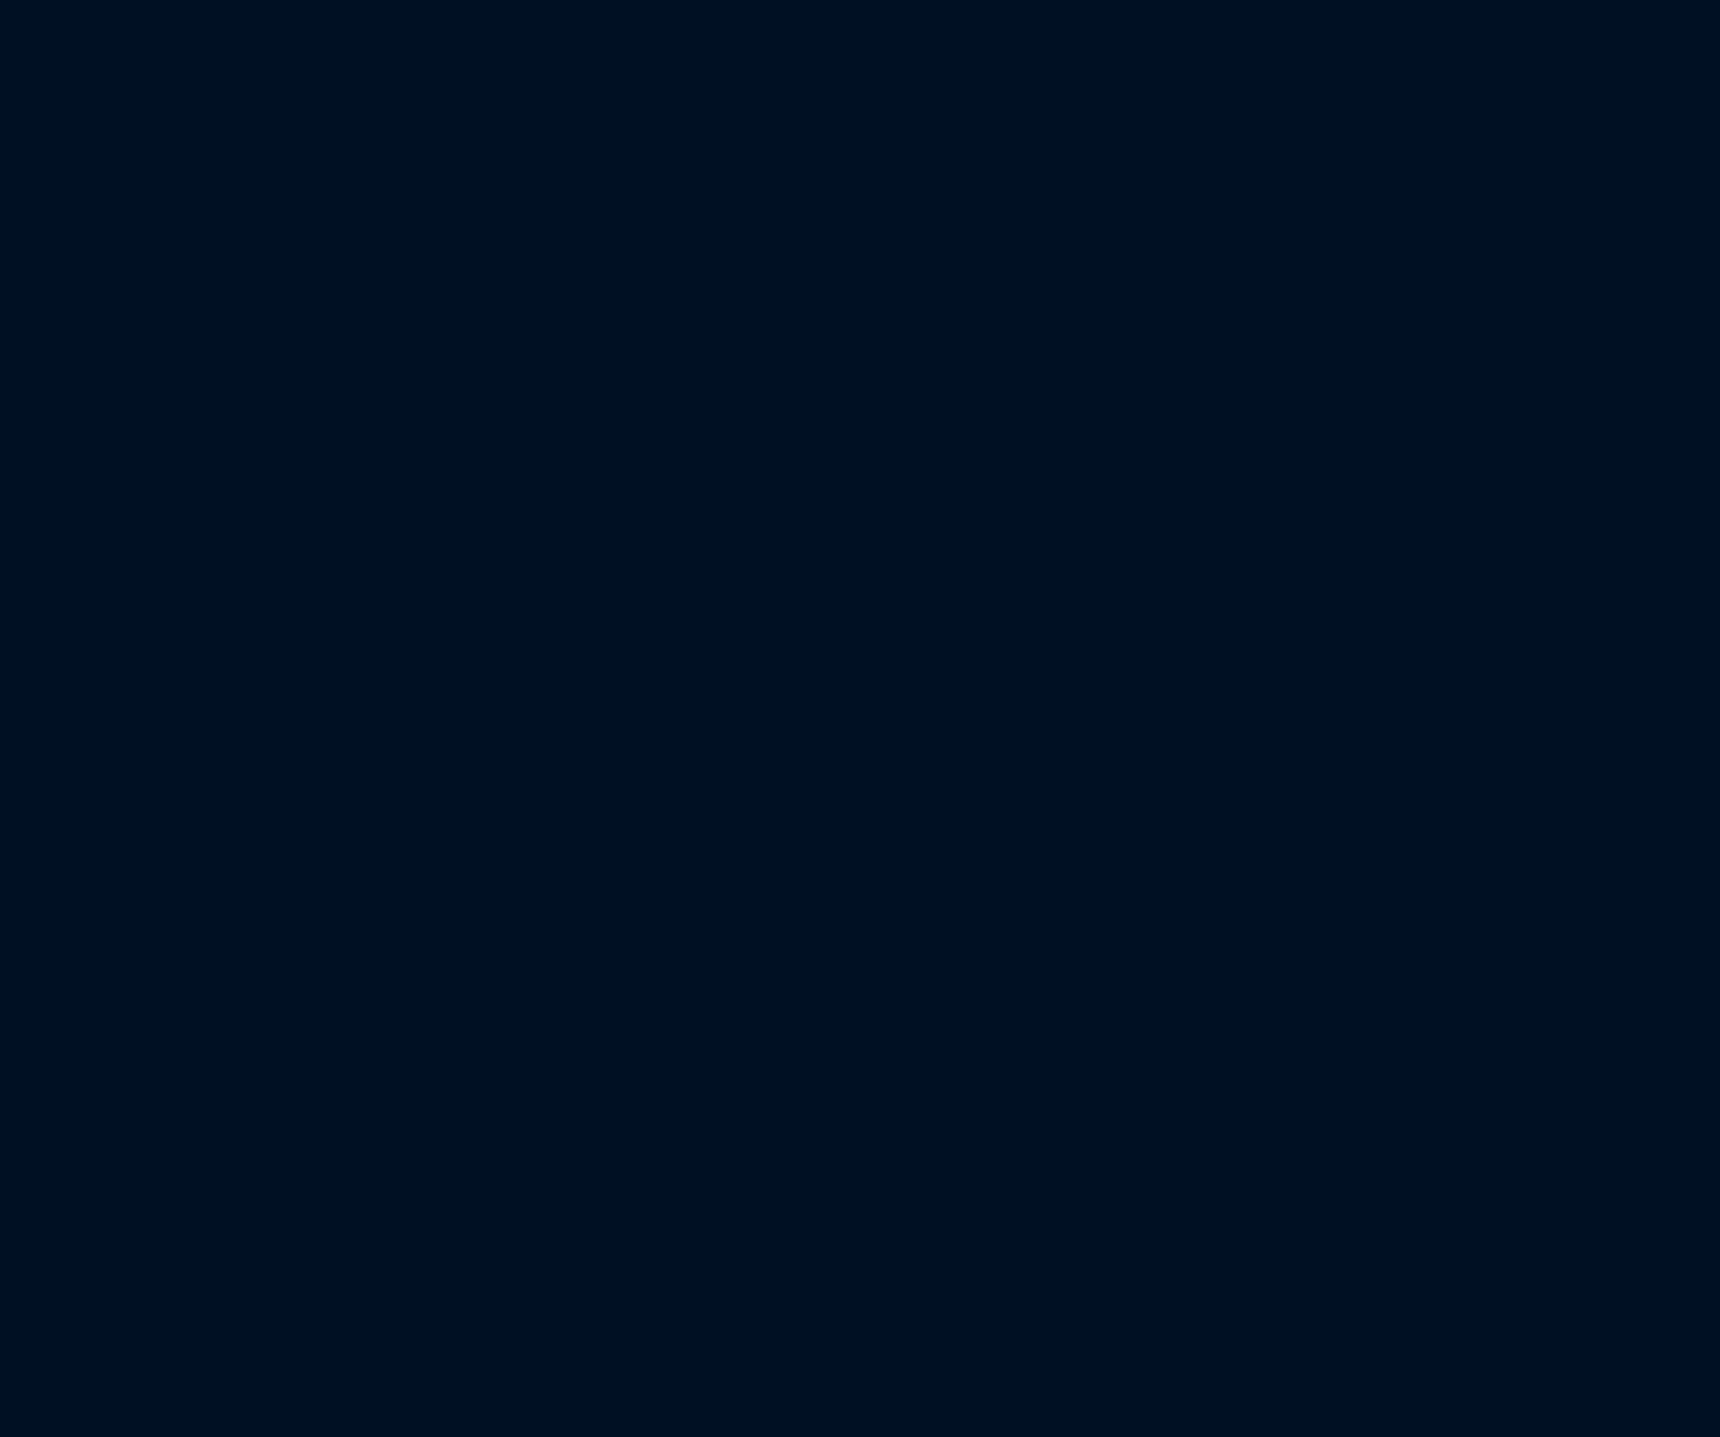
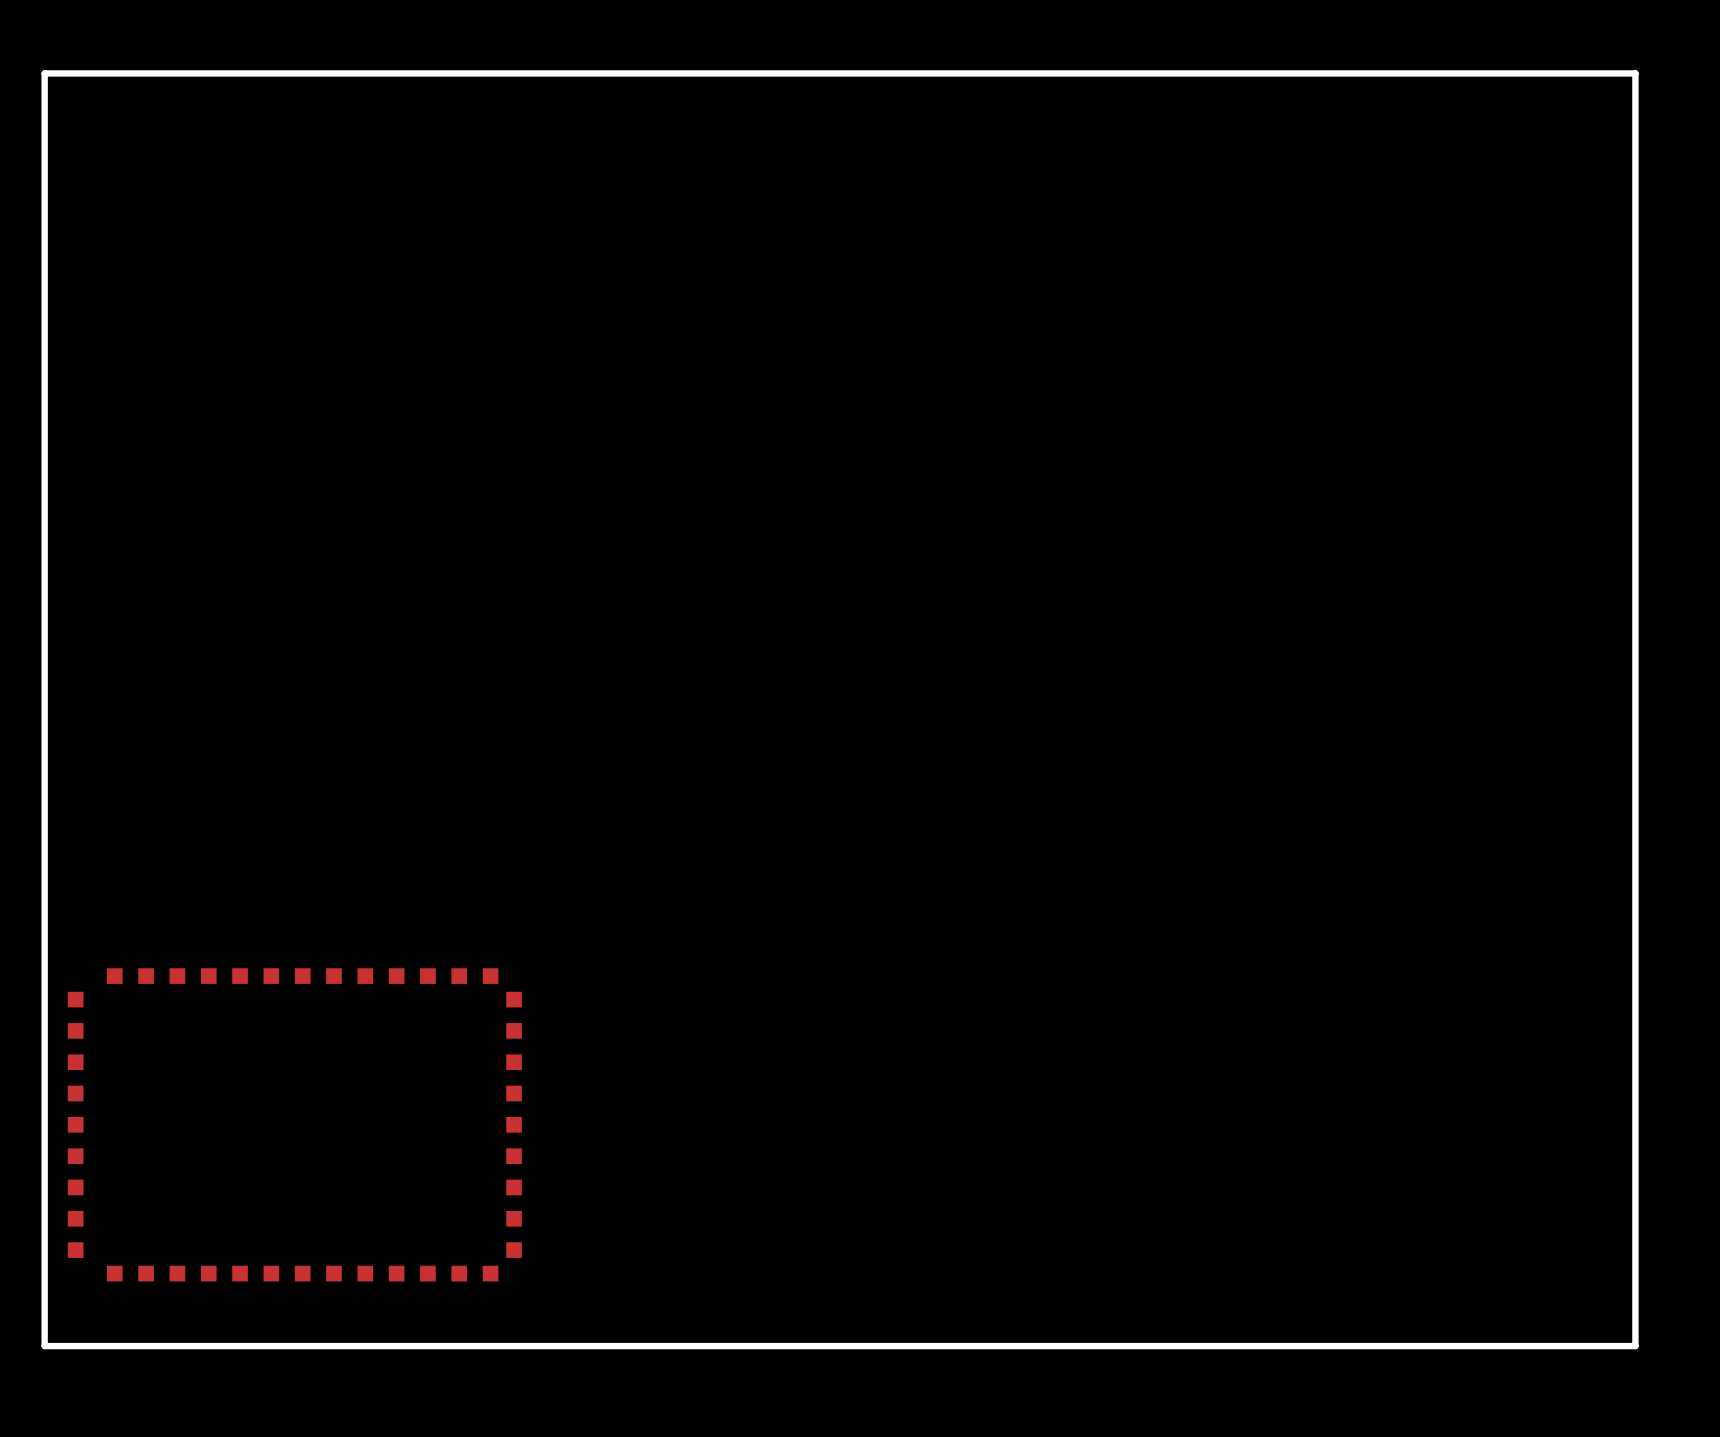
board edge: none -> (1635, 73) (1635, 1346) (44, 1346) (44, 73) (1635, 73)
part: none -> (294, 1124)

